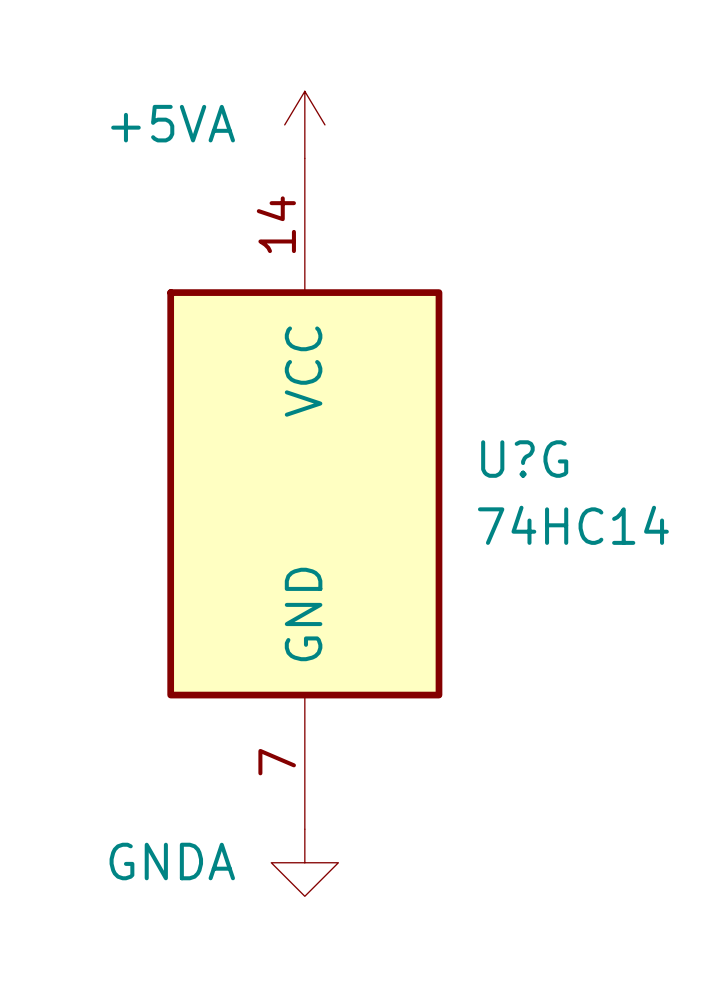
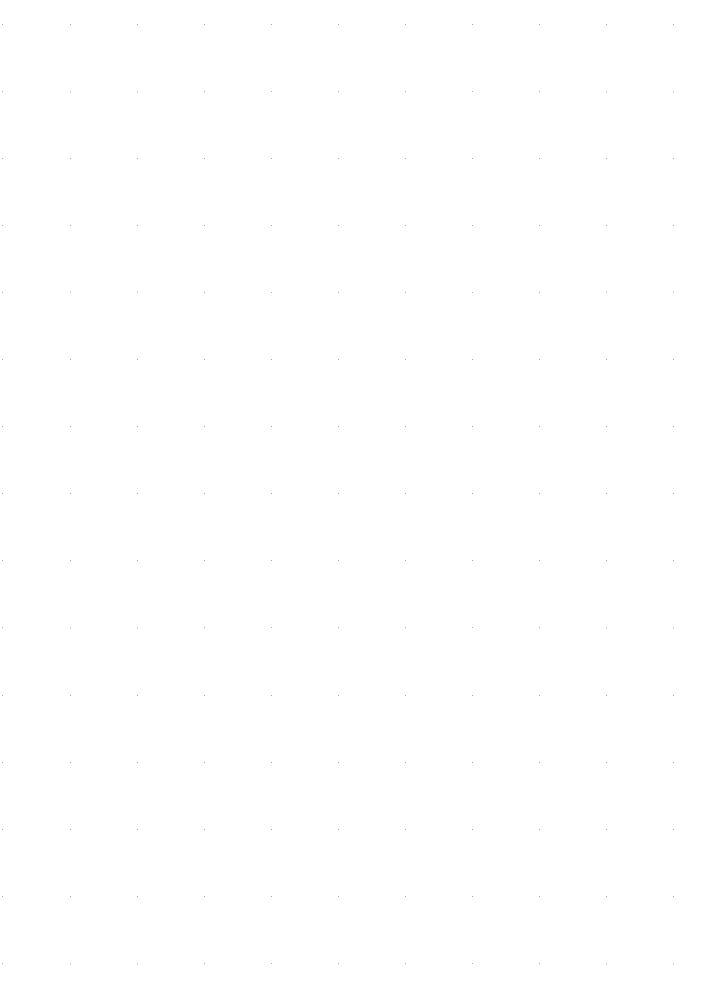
power symbol: +5VA (304, 124) -> none
U?G: 74HC14 (304, 493) -> none
power symbol: GNDA (304, 862) -> none

